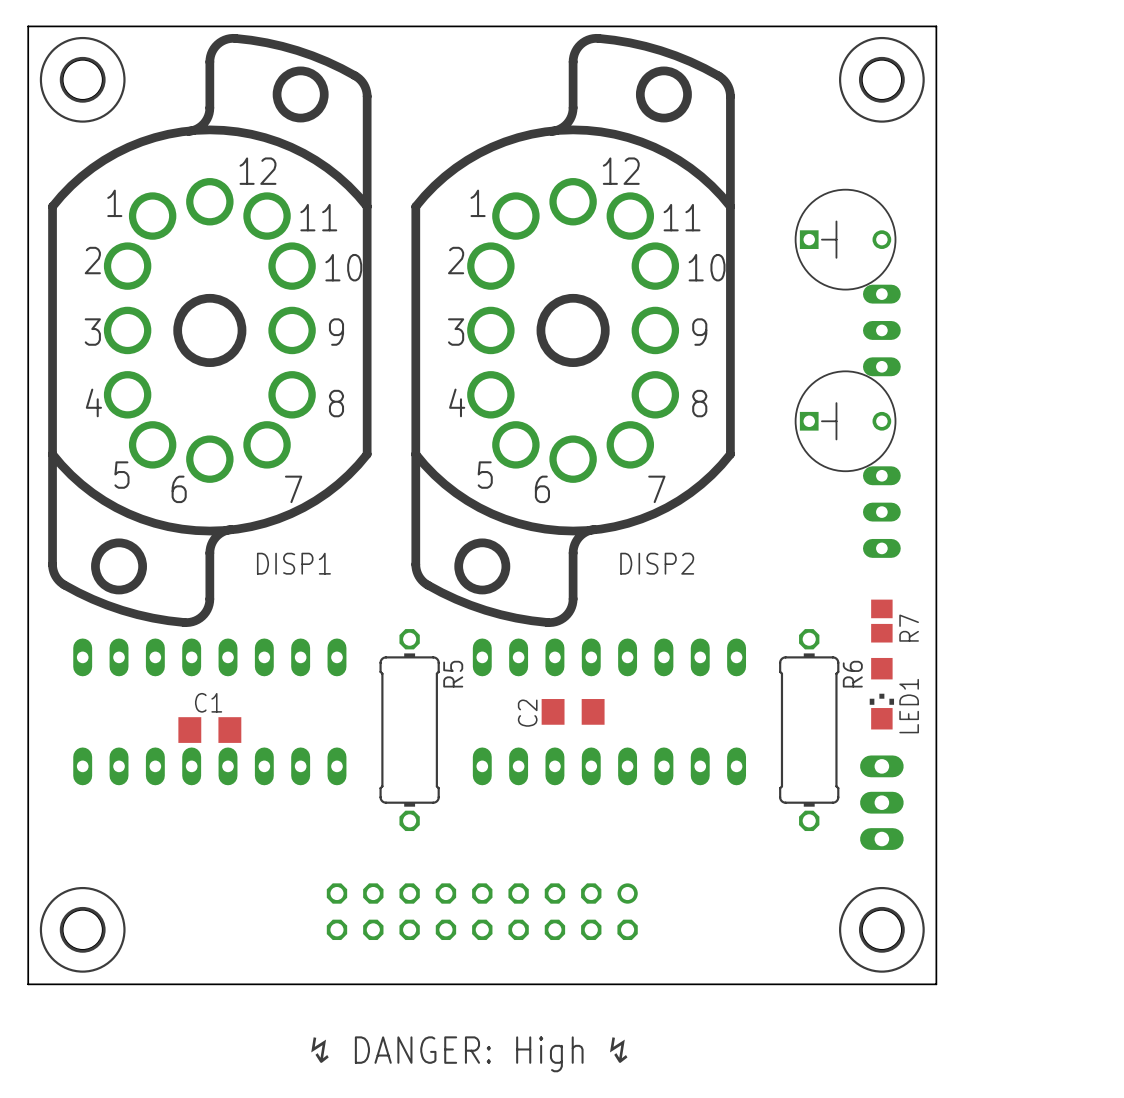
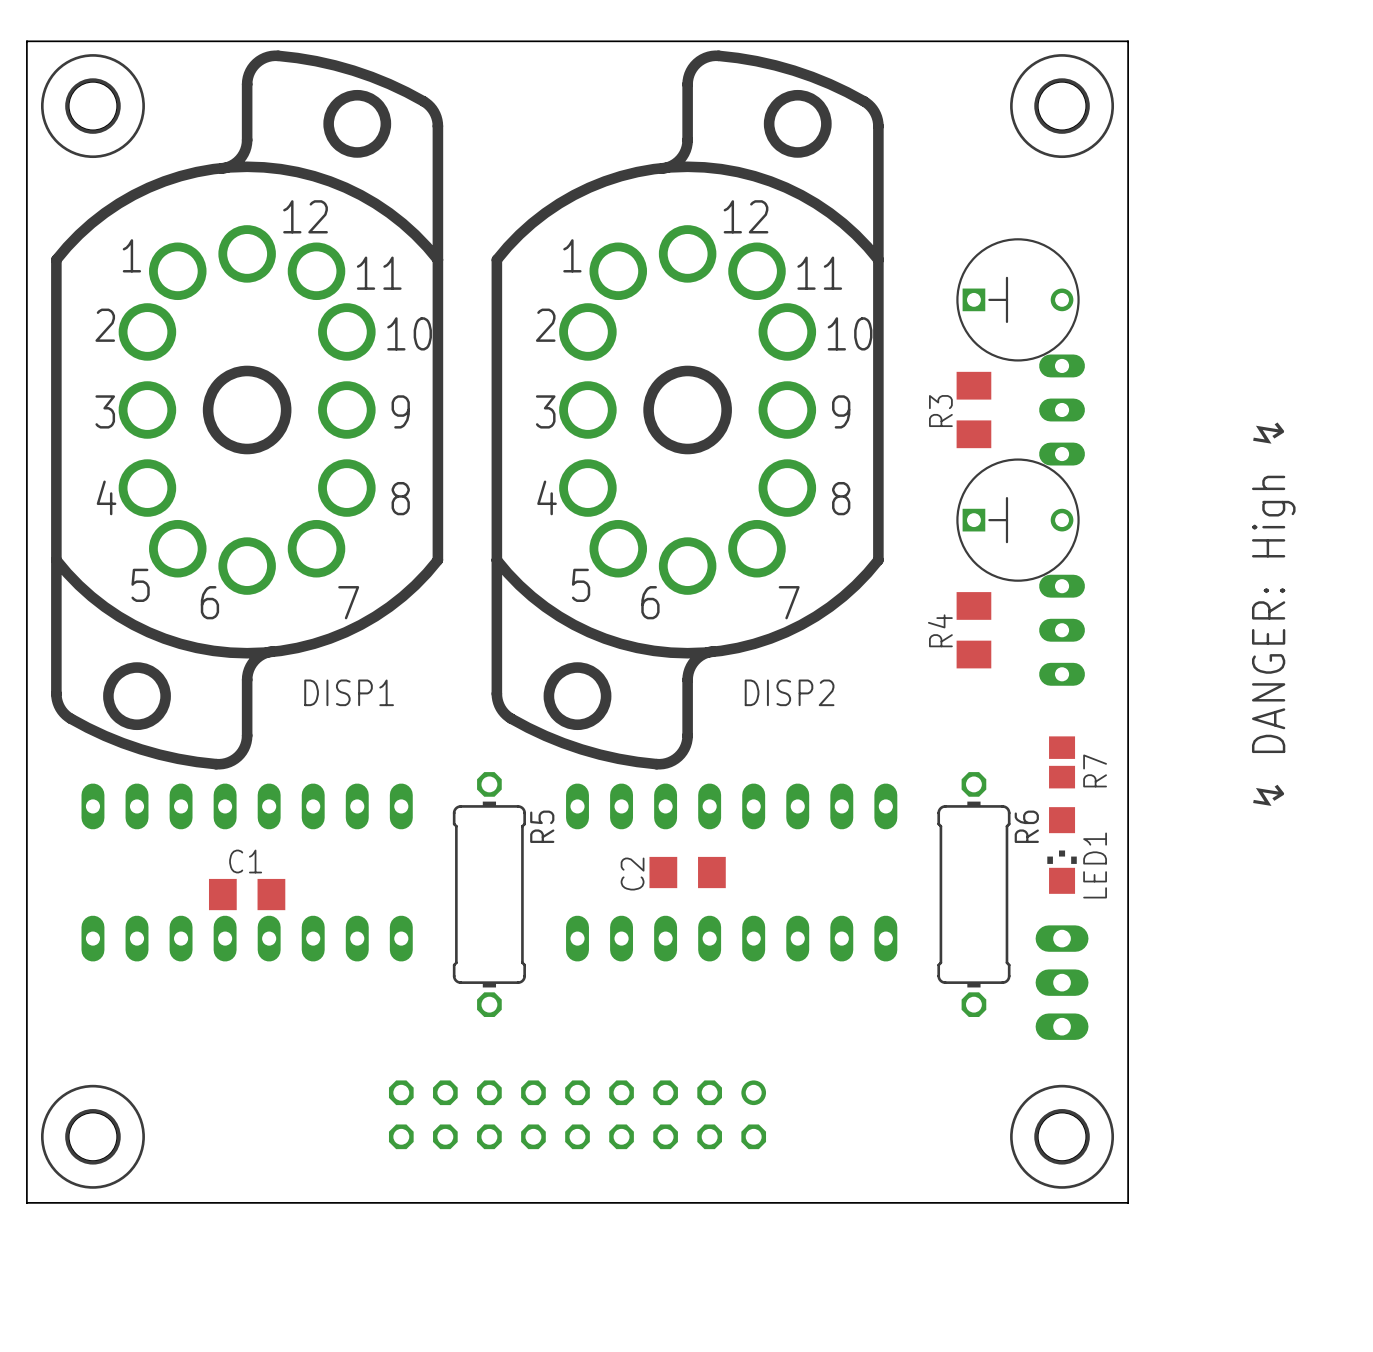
R3: none -> (973, 410)
text: none -> ↯ DANGER: High ↯ (1273, 614)
R4: none -> (973, 630)
text: ↯ DANGER: High ↯ (469, 1054) -> none

